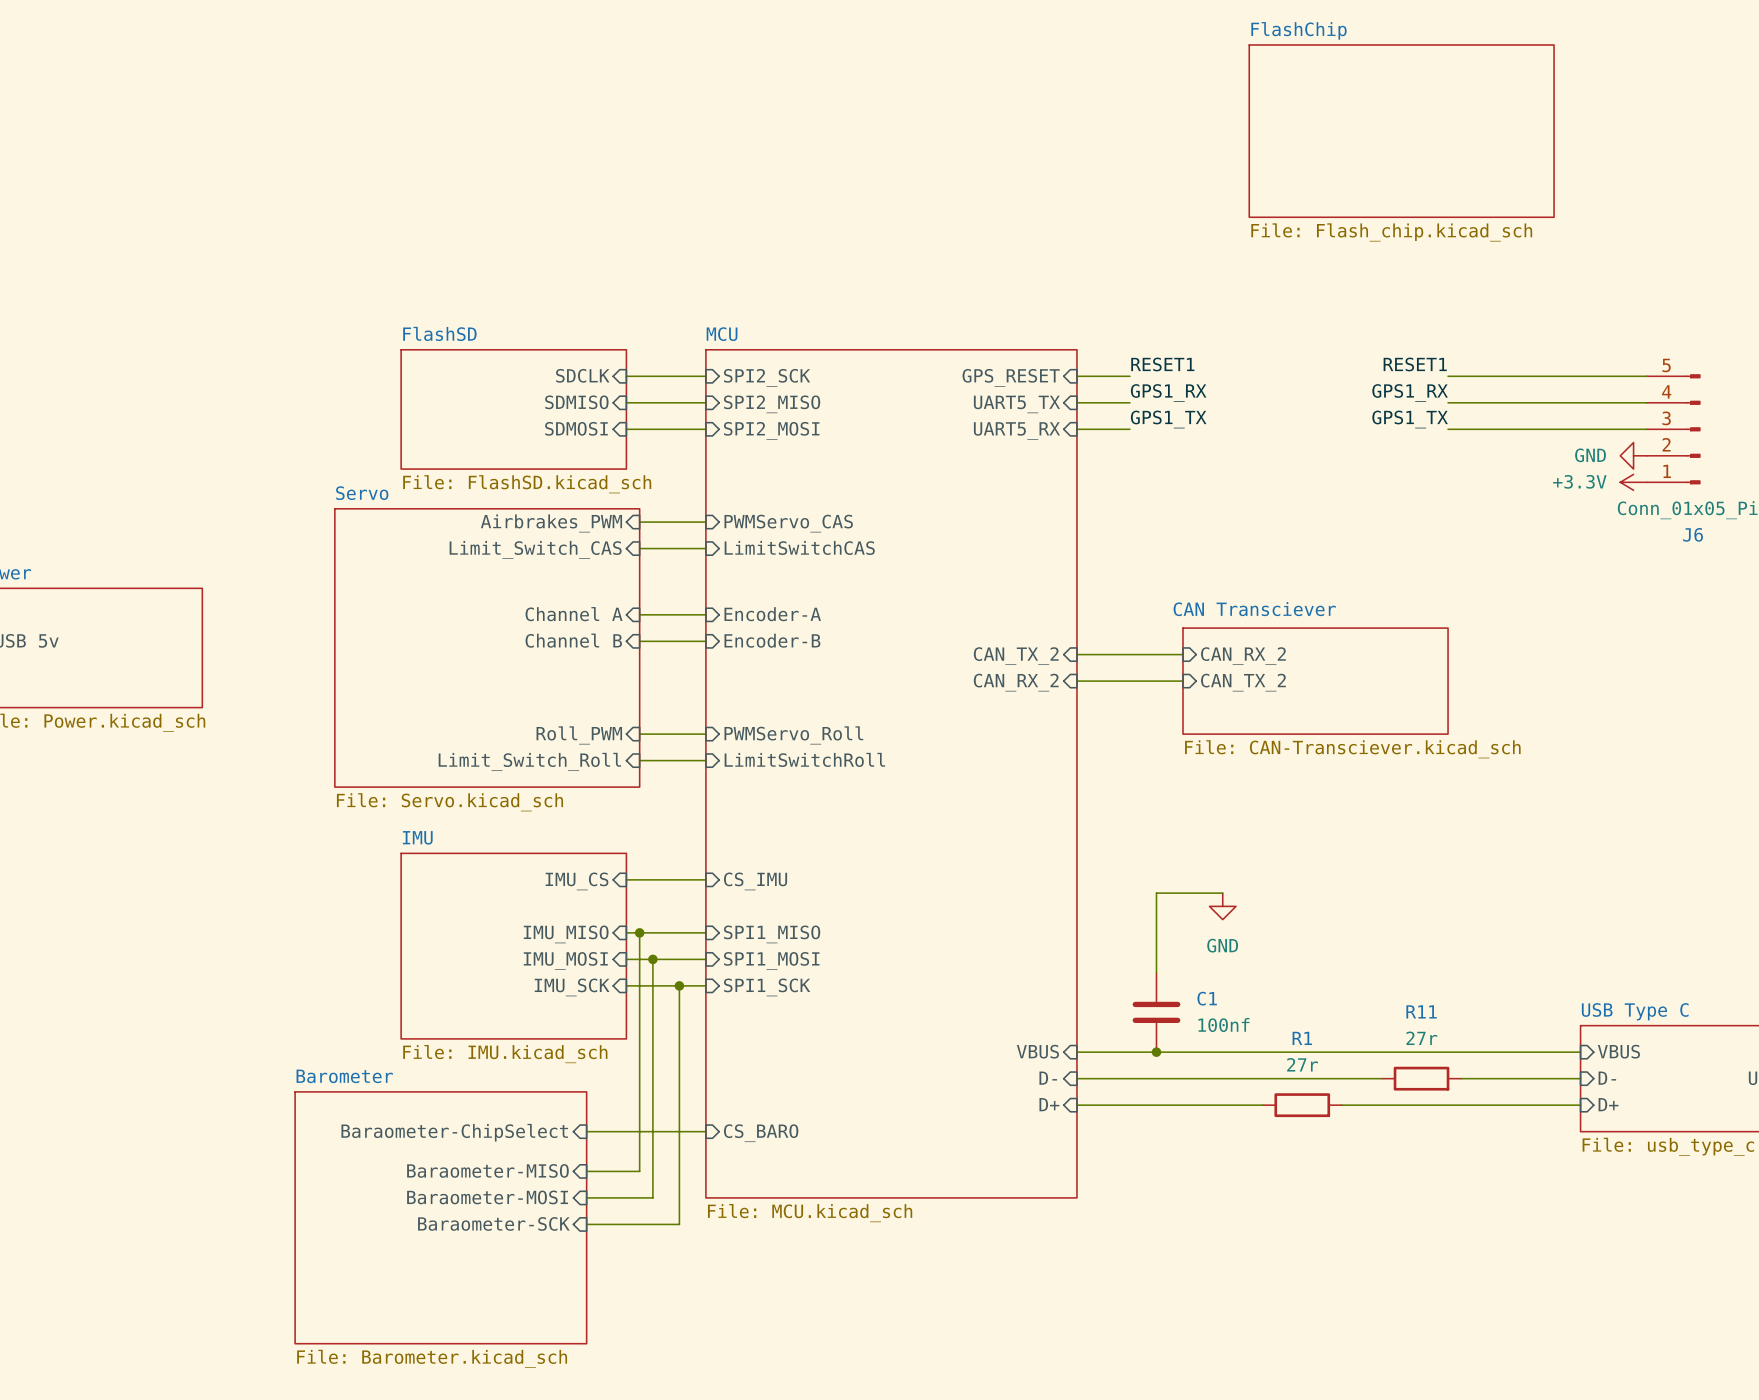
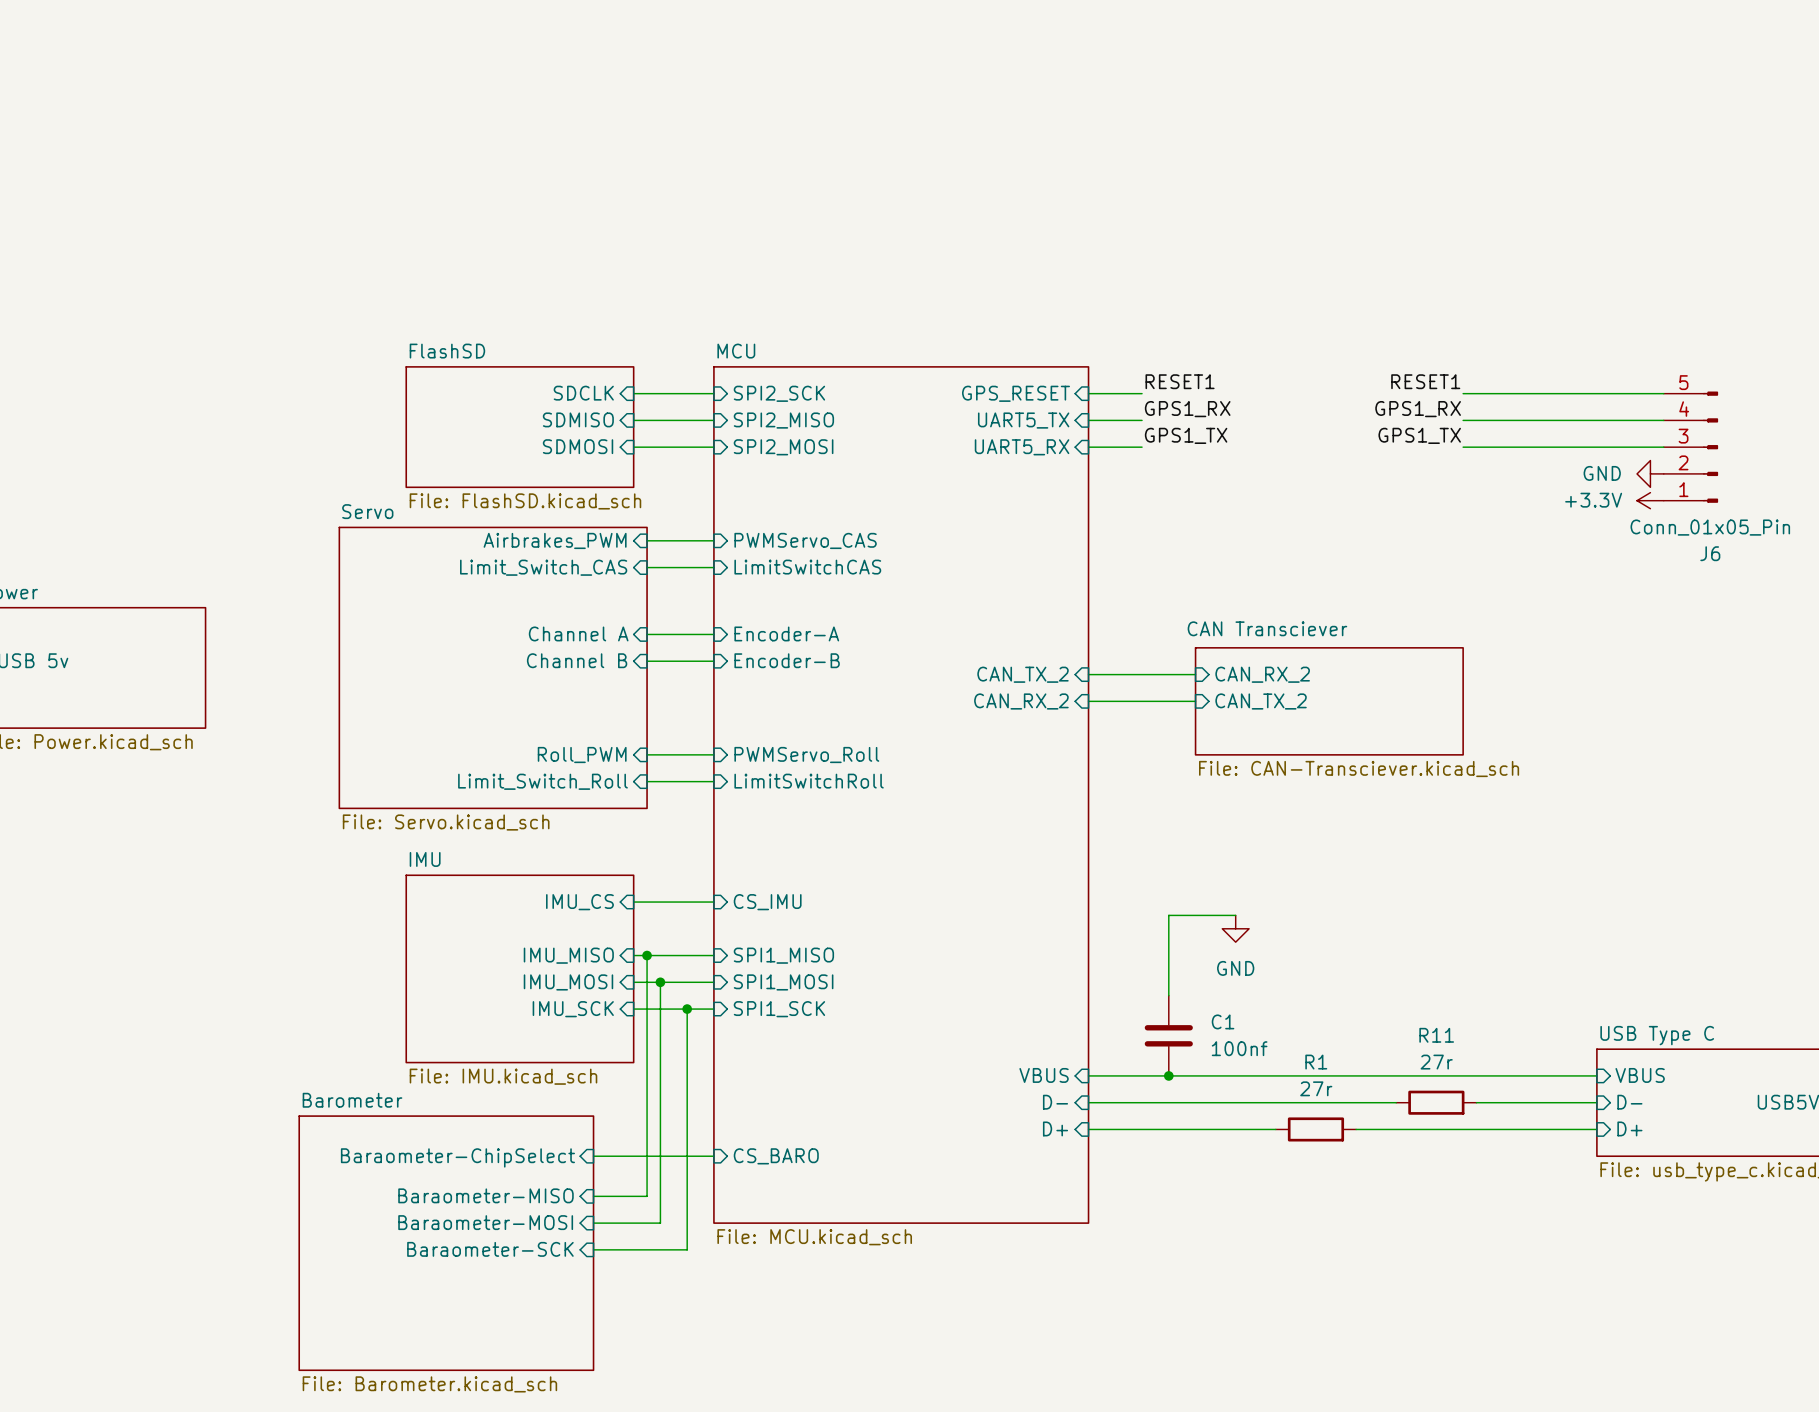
sheet FlashChip: File: Flash_chip.kicad_sch (1401, 131) -> none

